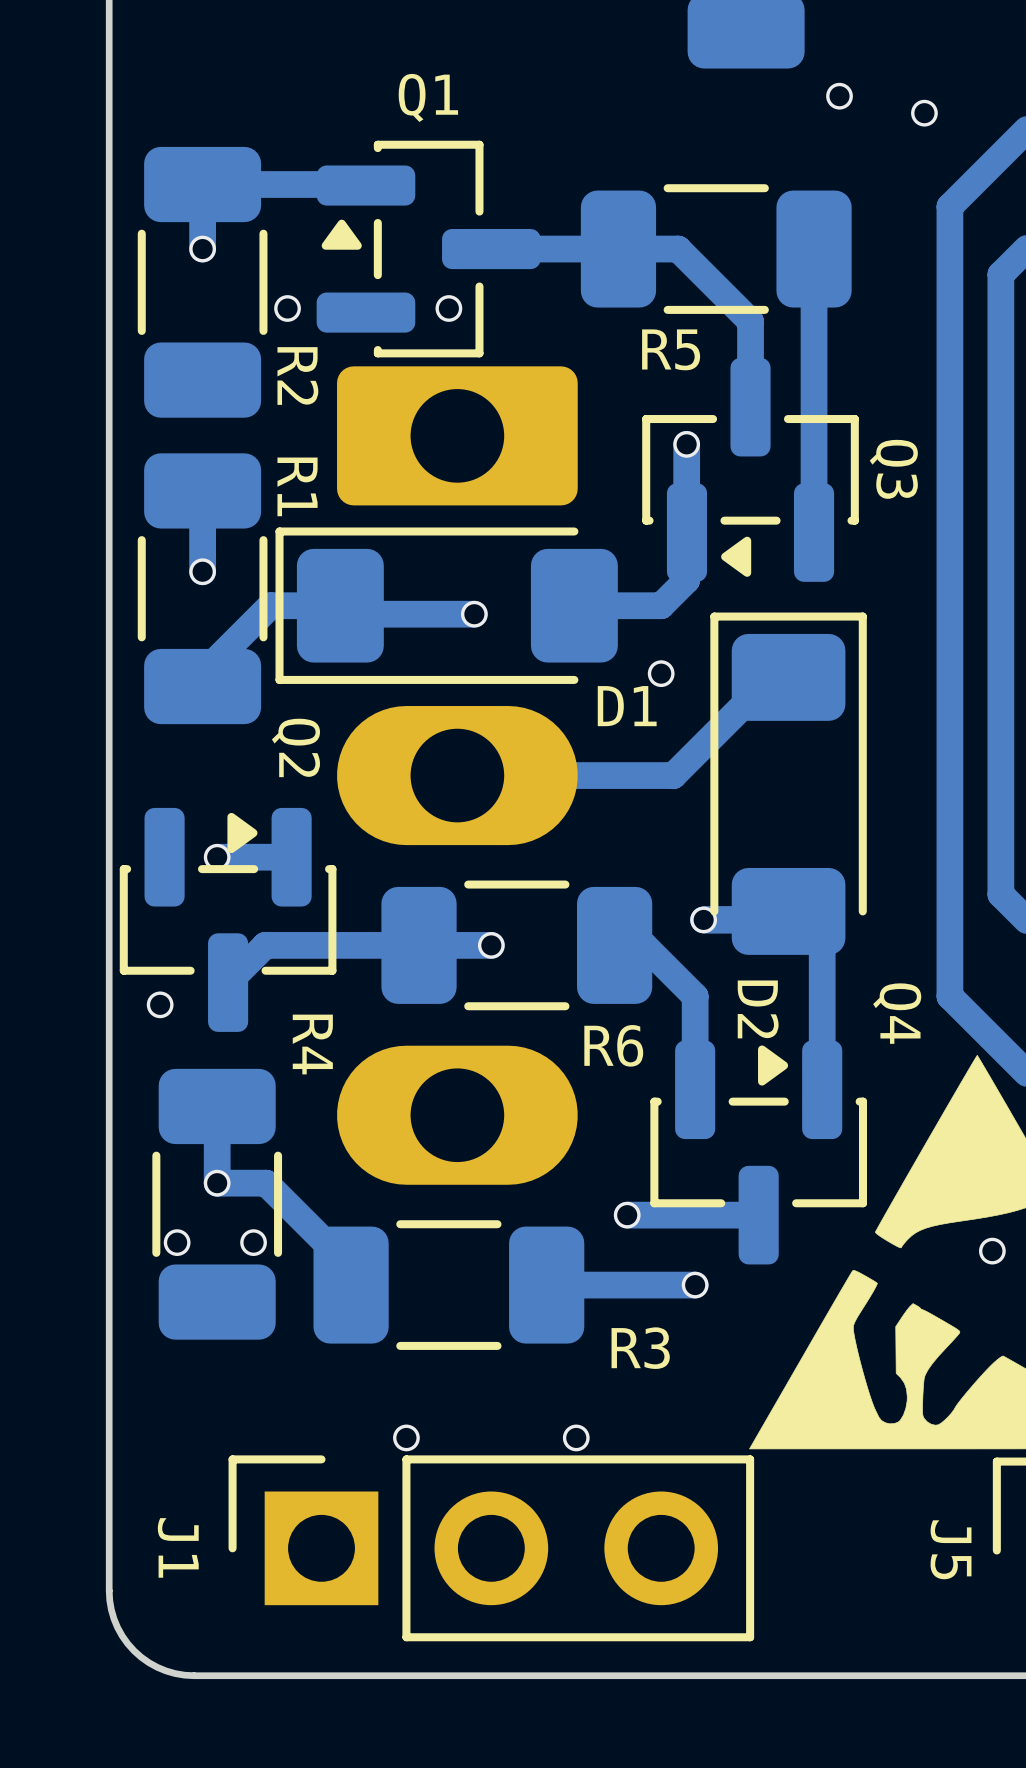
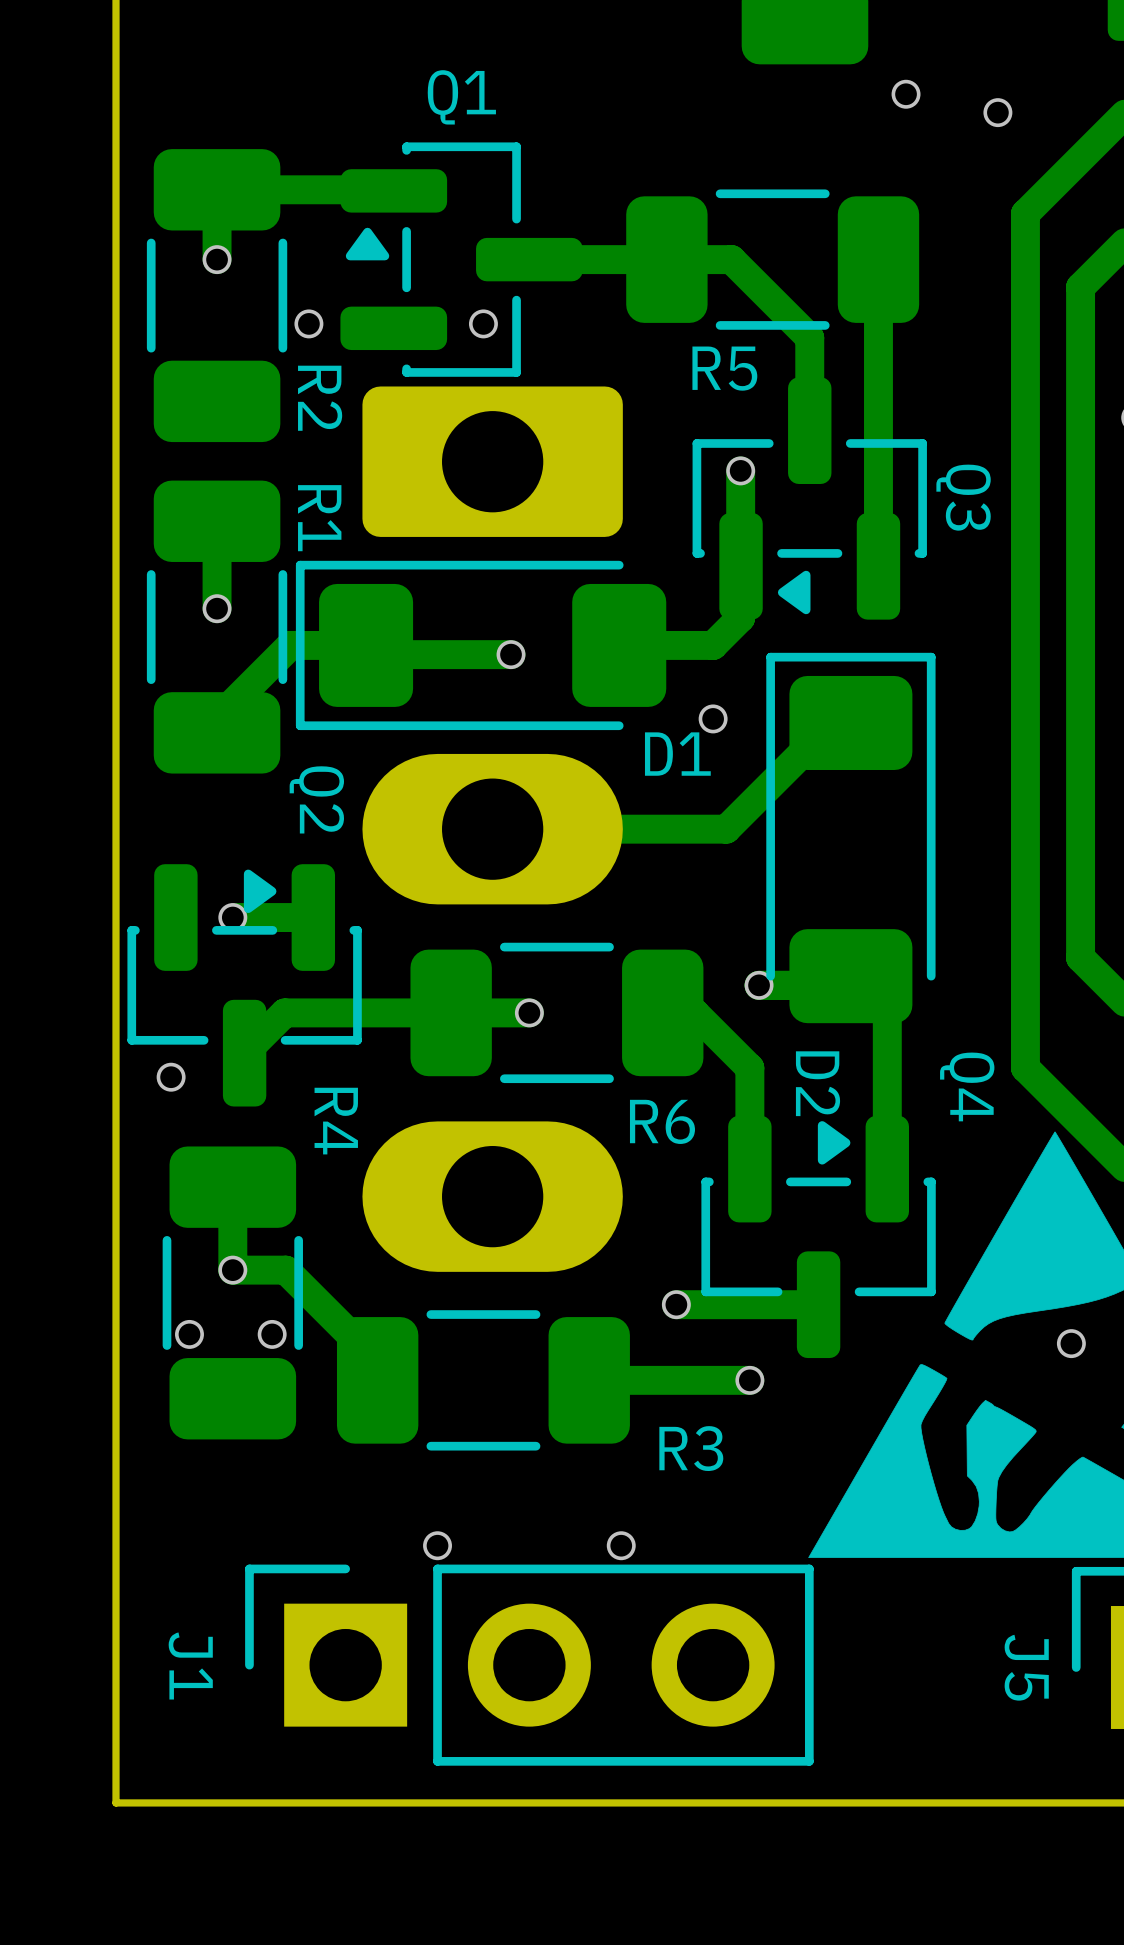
board edge: (109, 1590) (111, 1609) (117, 1627) (134, 1650) (157, 1667) (175, 1673) (194, 1675) -> (115, 1711) (115, 1802) (207, 1802)

